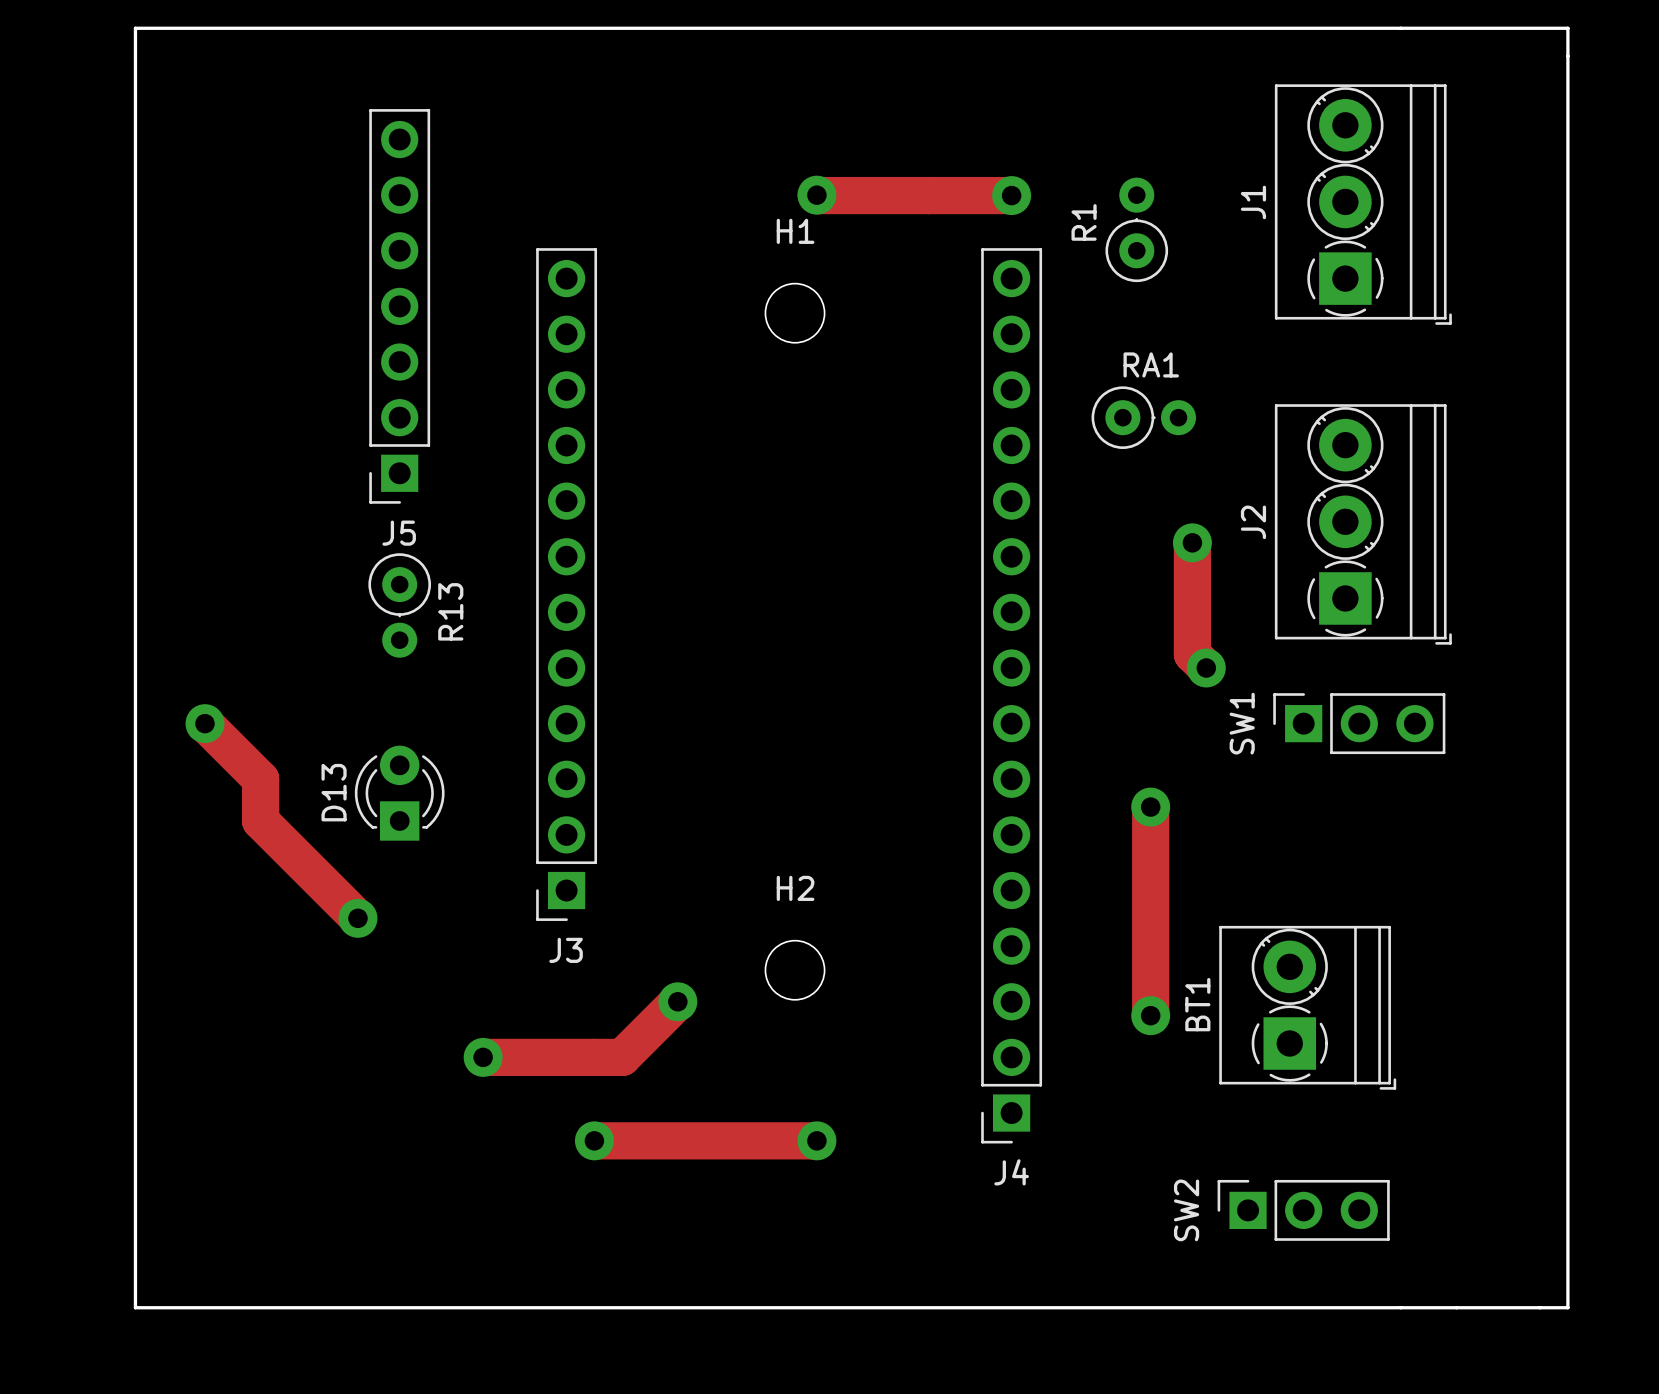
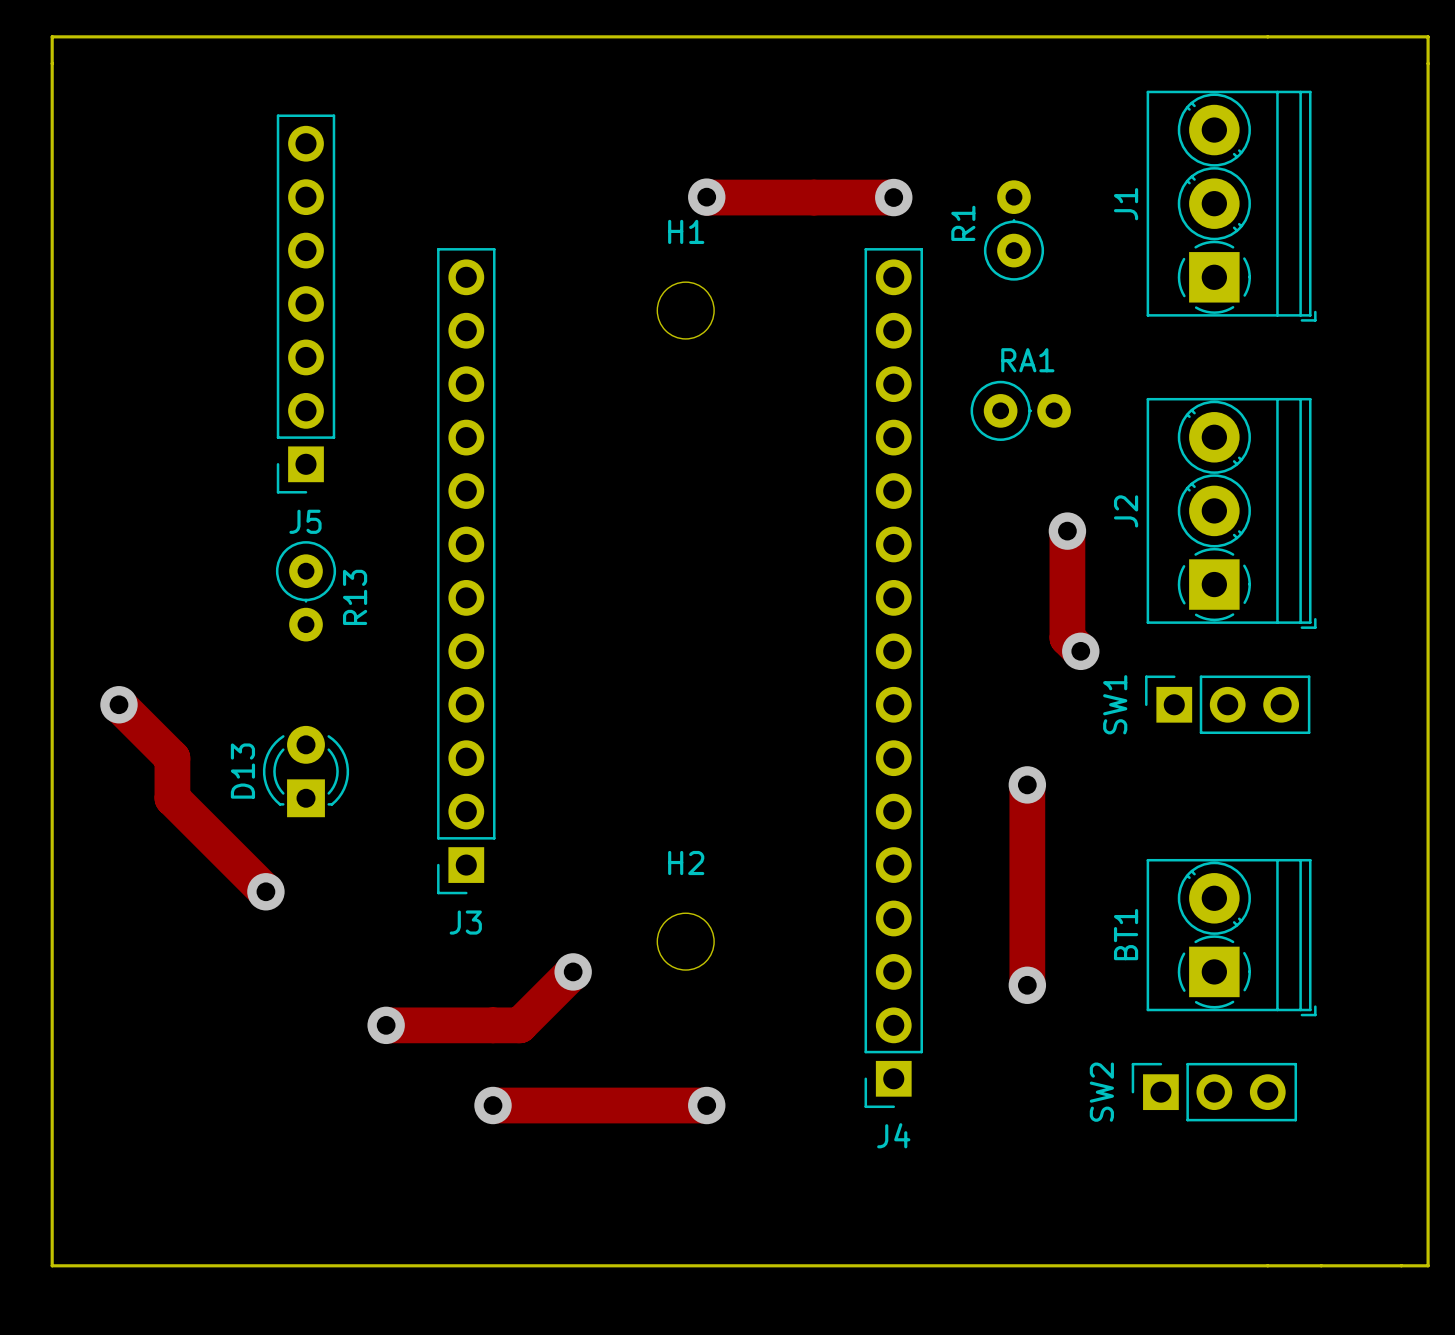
BT1 position: (1307, 1007) -> (1231, 937)
SW2 position: (1303, 1210) -> (1214, 1092)

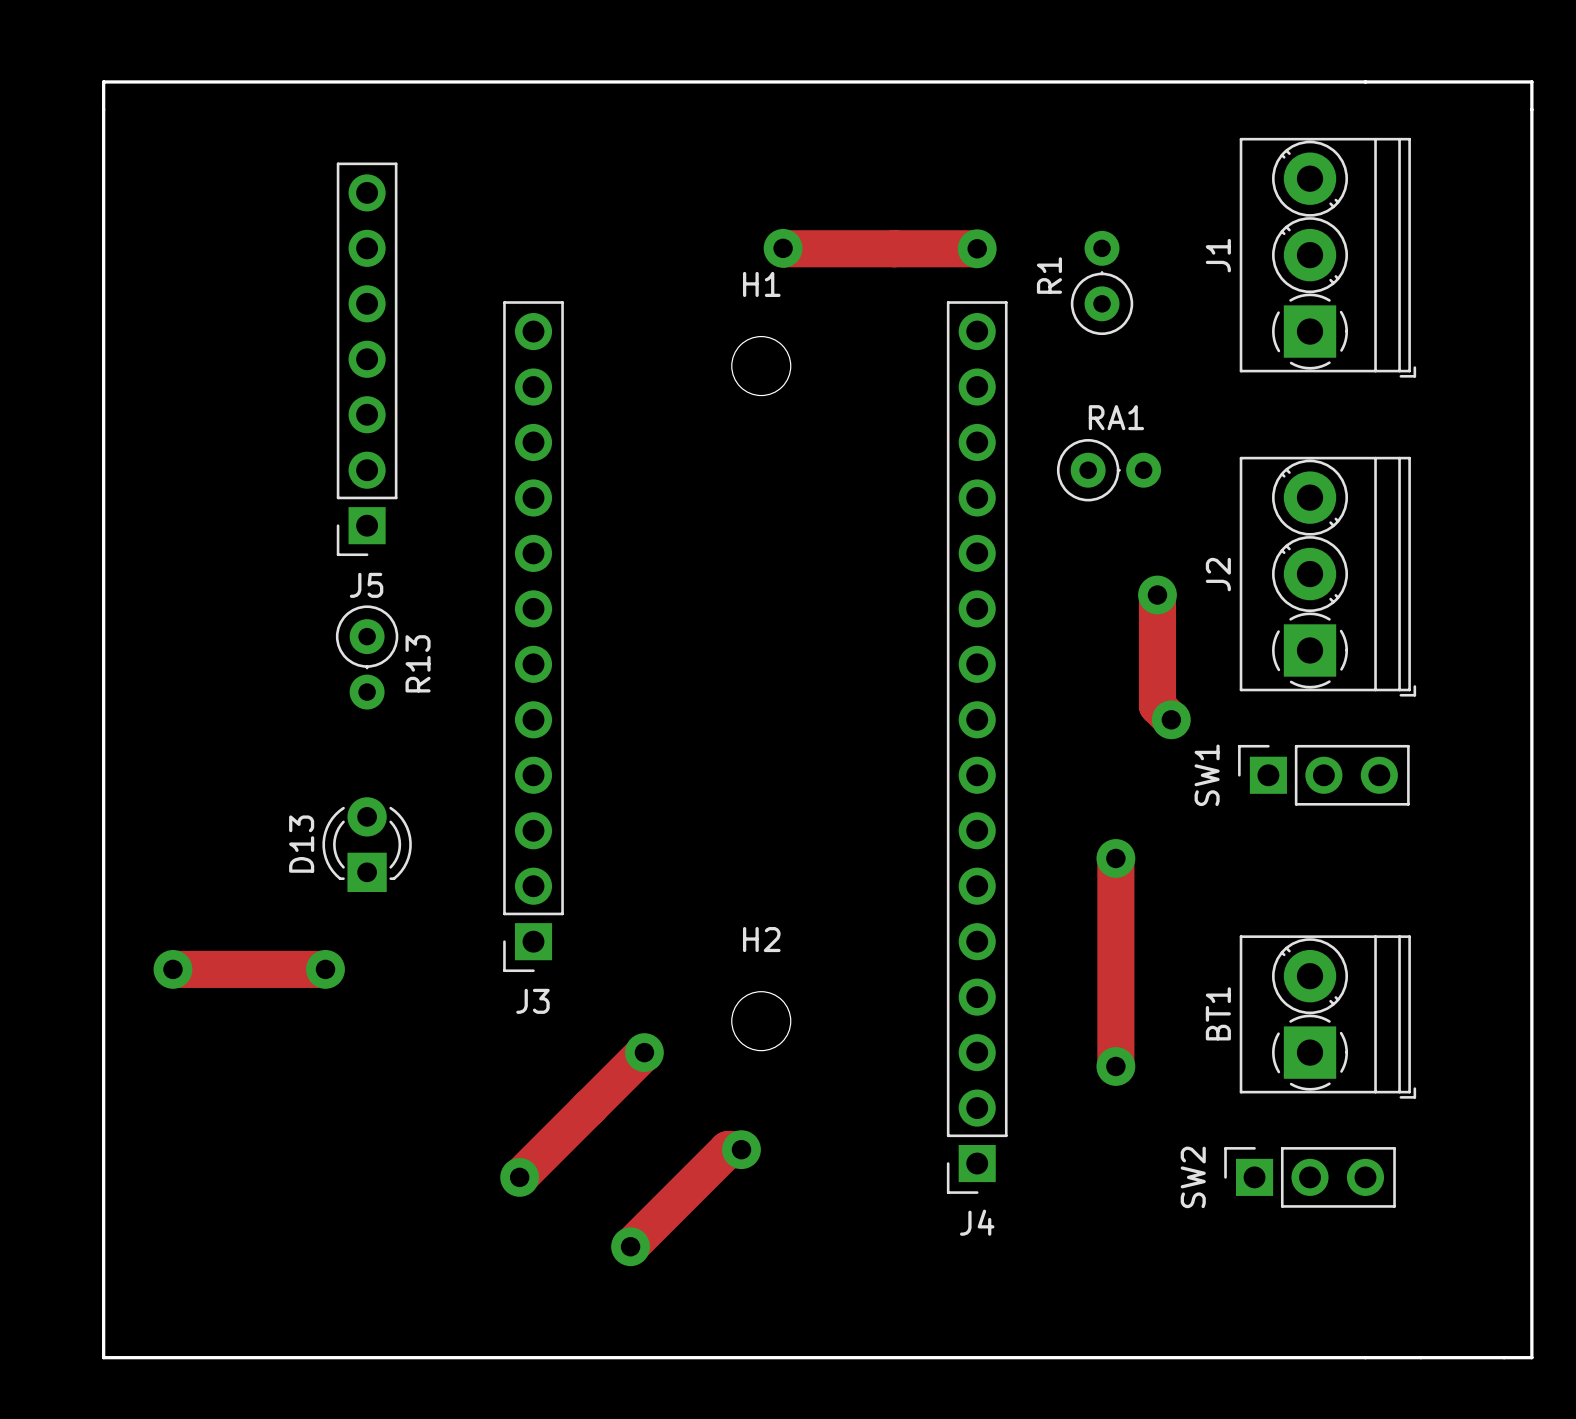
track: (118, 704) (172, 758) (172, 798) (265, 891) -> (172, 969) (325, 969)
via: (118, 704) -> none
via: none -> (172, 969)
track: (386, 1025) (519, 1025) -> (519, 1177) (588, 1108)
via: (386, 1025) -> none
track: none -> (741, 1149) (727, 1149) (630, 1246)
track: (493, 1105) (706, 1105) -> none
via position: (493, 1105) -> (519, 1177)
via position: (706, 1105) -> (741, 1149)
via: none -> (630, 1246)

